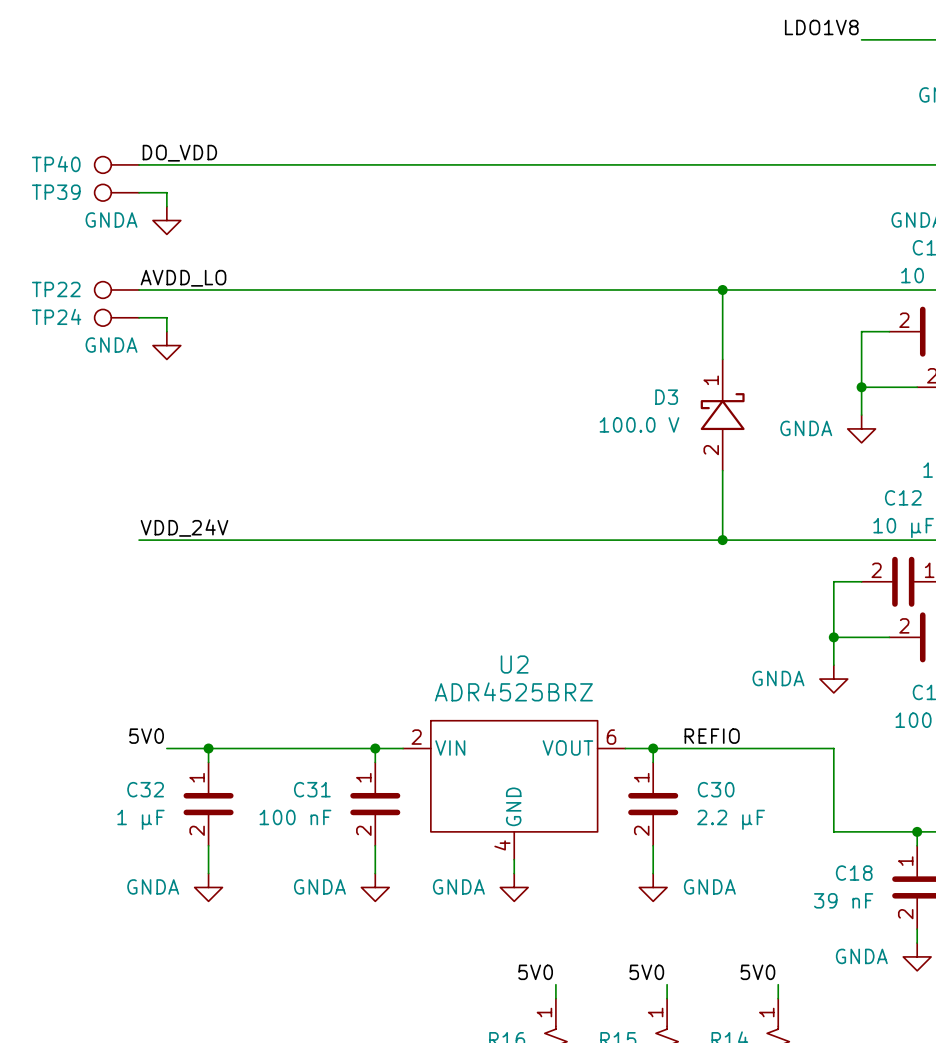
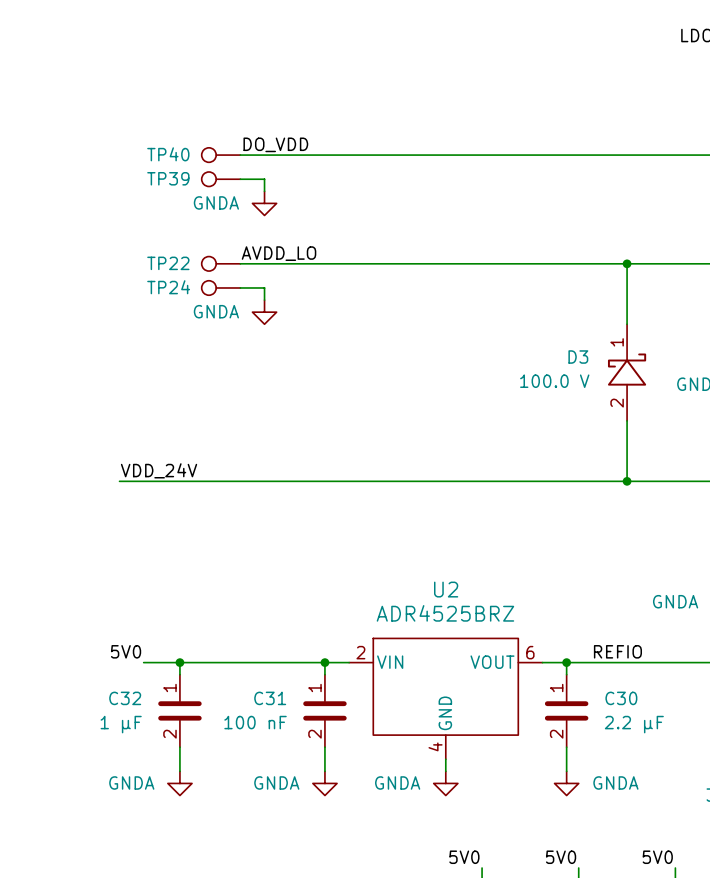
label position: DO_VDD (179, 153) -> DO_VDD (275, 144)
TP40 position: (116, 164) -> (221, 155)
wire: (139, 164) (278, 164) -> none
TP39 position: (116, 192) -> (221, 179)
wire: (139, 192) (166, 192) (166, 206) -> (240, 179) (264, 179) (264, 191)
power symbol: GNDA (166, 220) -> none
power symbol: none -> GNDA (264, 203)
label position: AVDD_LO (183, 278) -> AVDD_LO (279, 253)
TP22 position: (116, 289) -> (221, 263)
wire: (139, 289) (278, 289) -> none
TP24 position: (116, 317) -> (221, 287)
wire: (139, 317) (166, 317) (166, 331) -> (240, 287) (264, 287) (264, 300)
power symbol: GNDA (166, 345) -> none
power symbol: none -> GNDA (264, 312)

